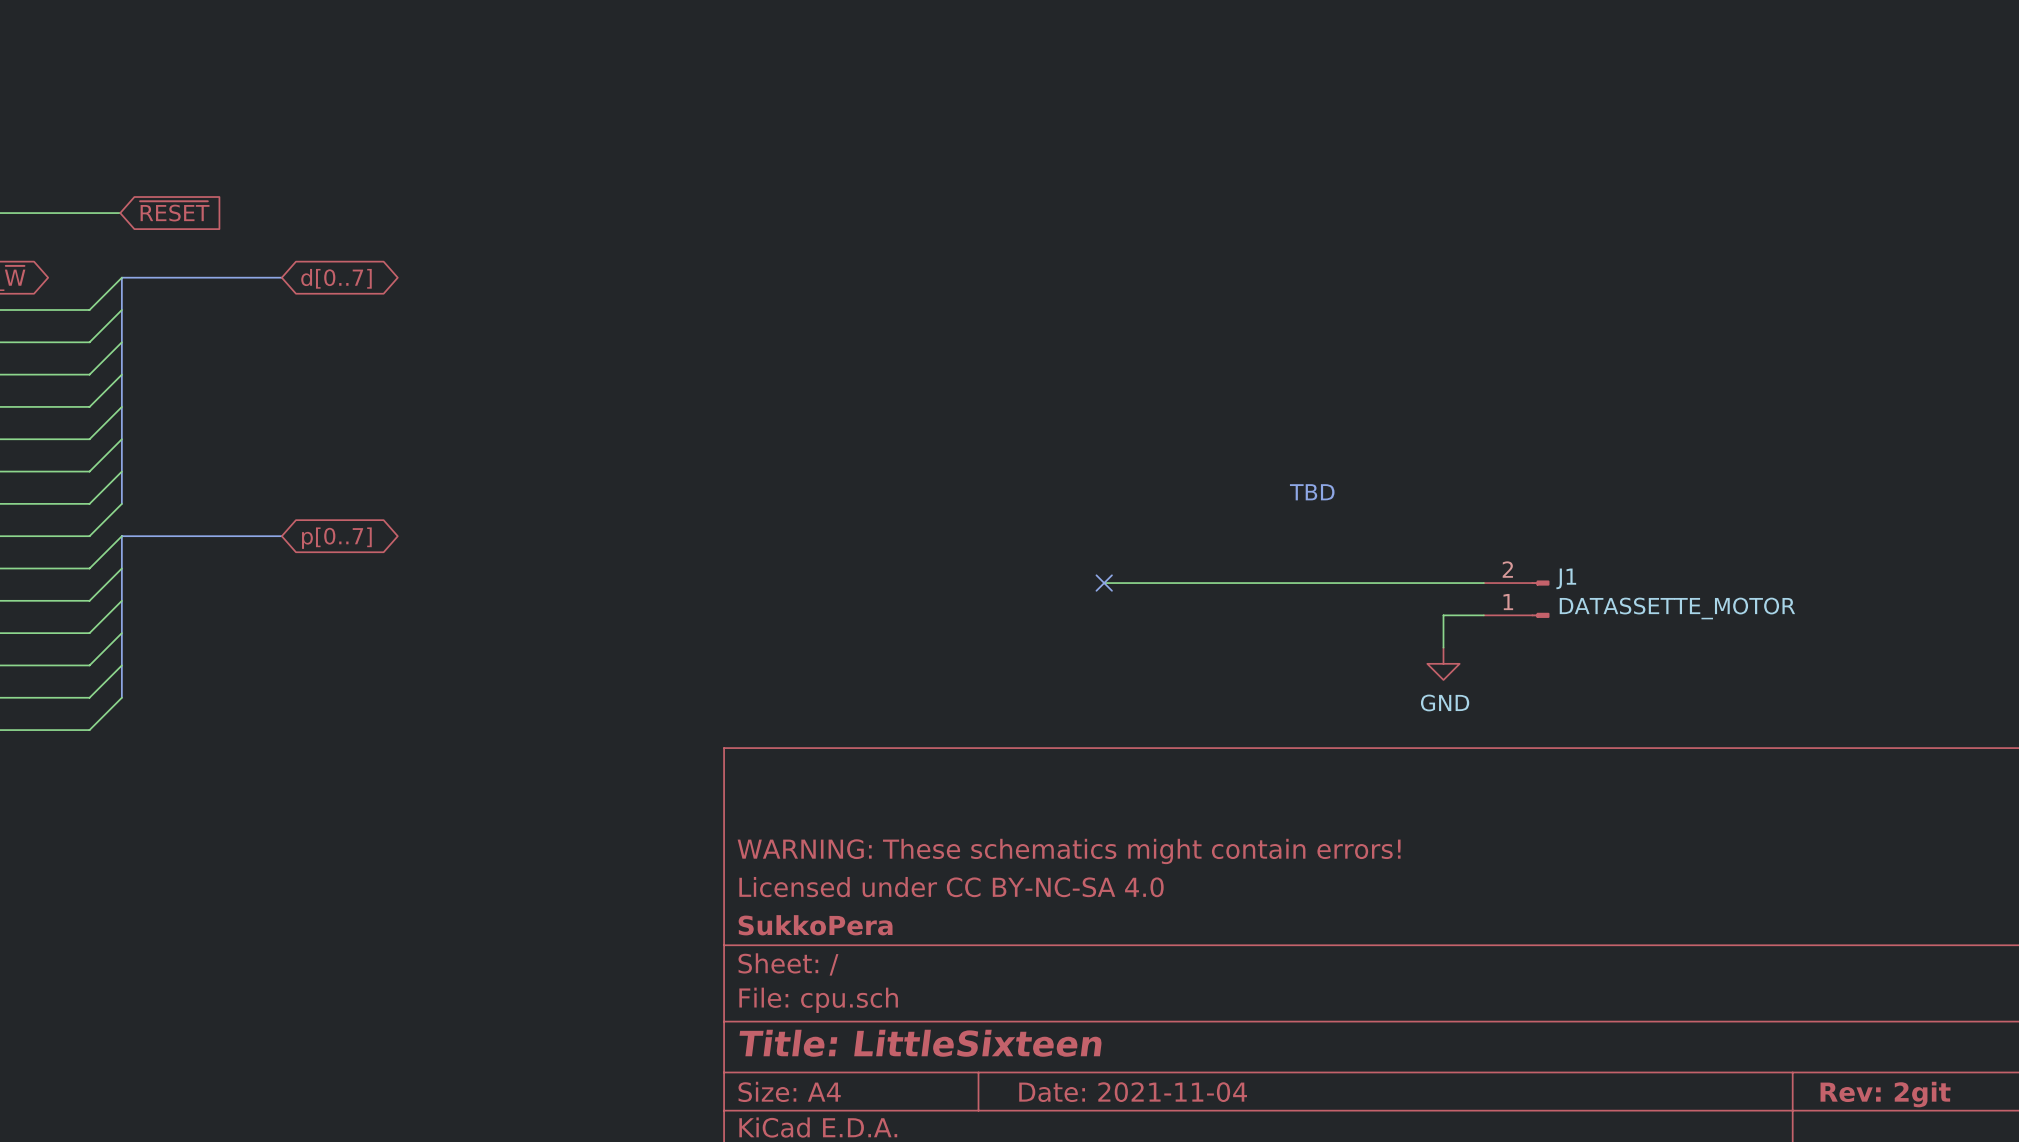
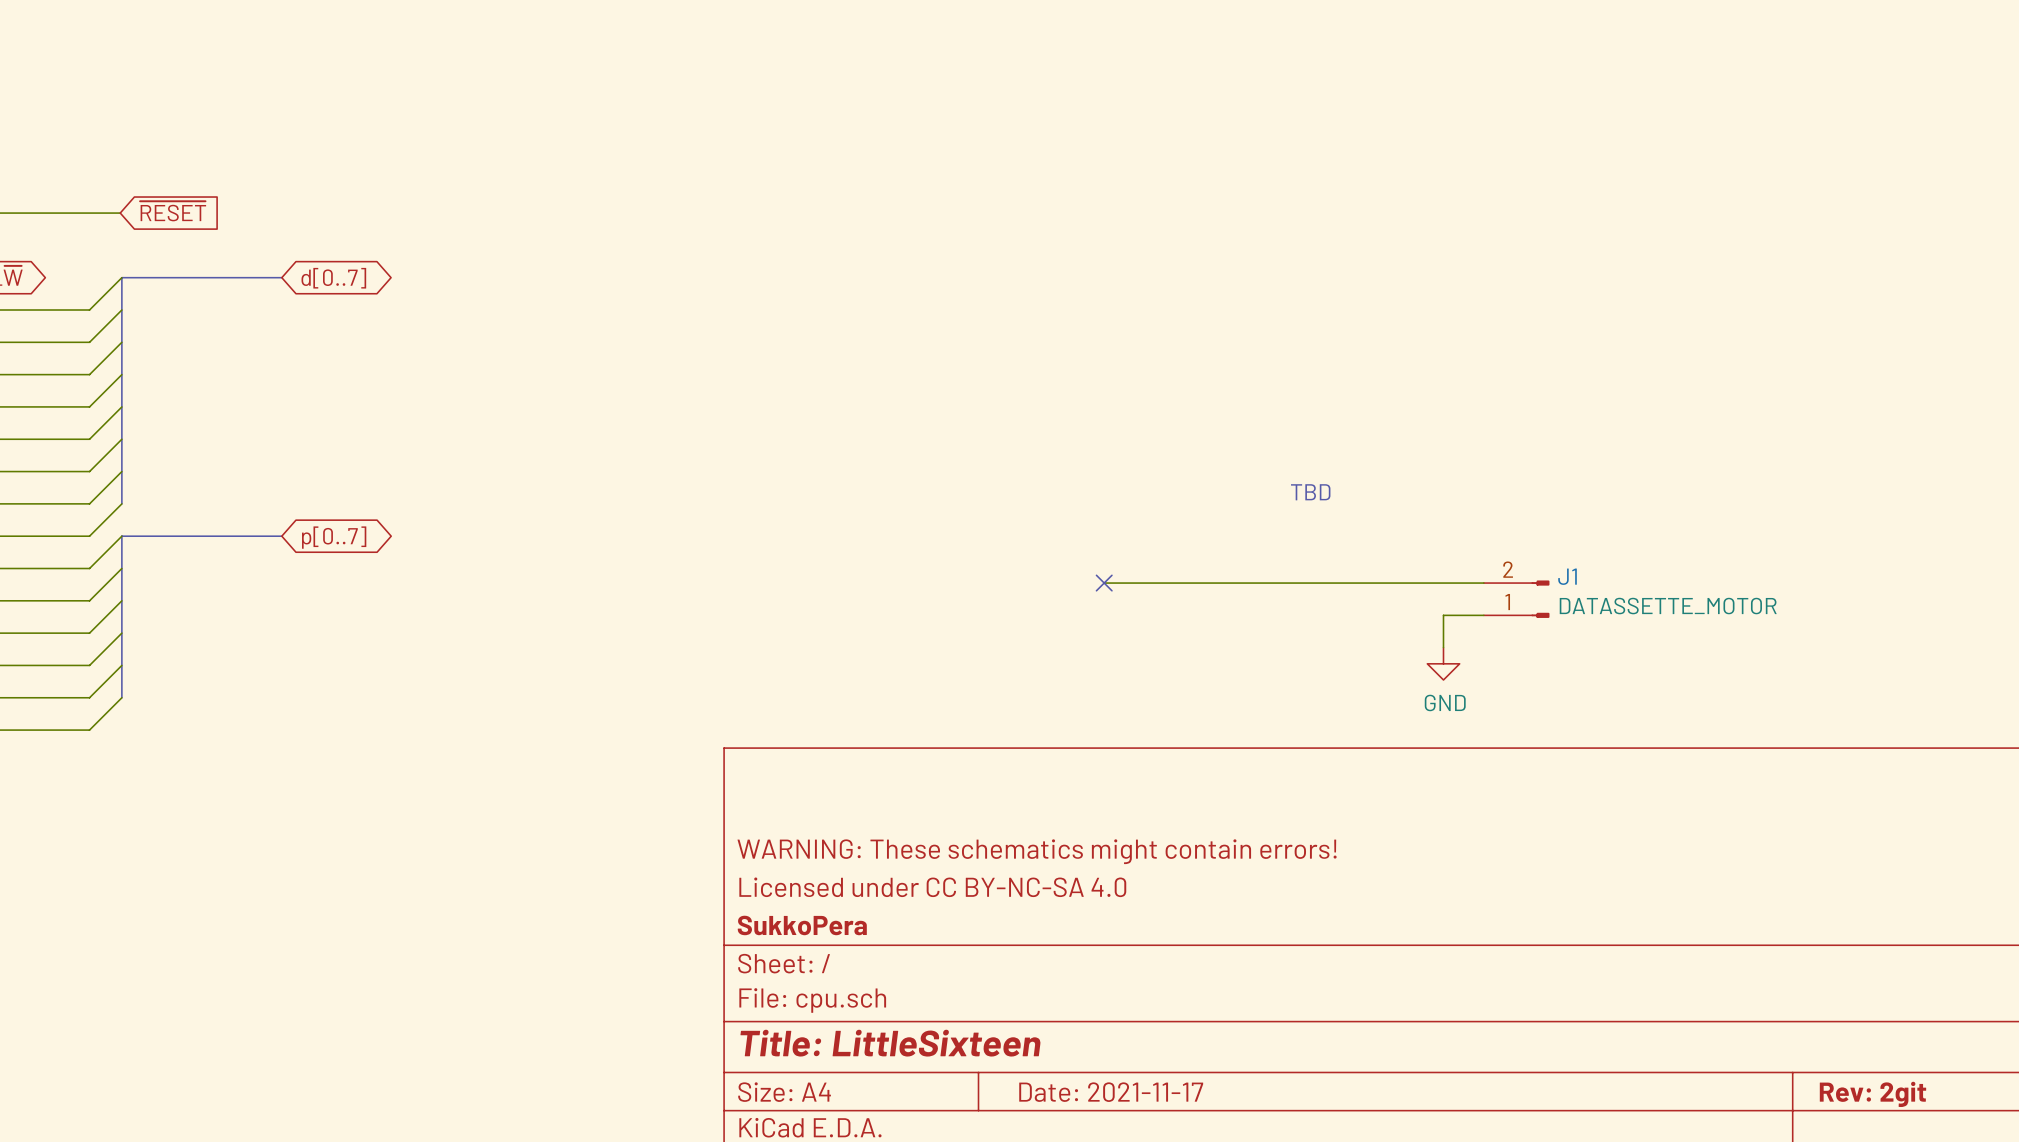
title block: Date: 2021-11-04 (1133, 1092) -> Date: 2021-11-17 (1111, 1092)

